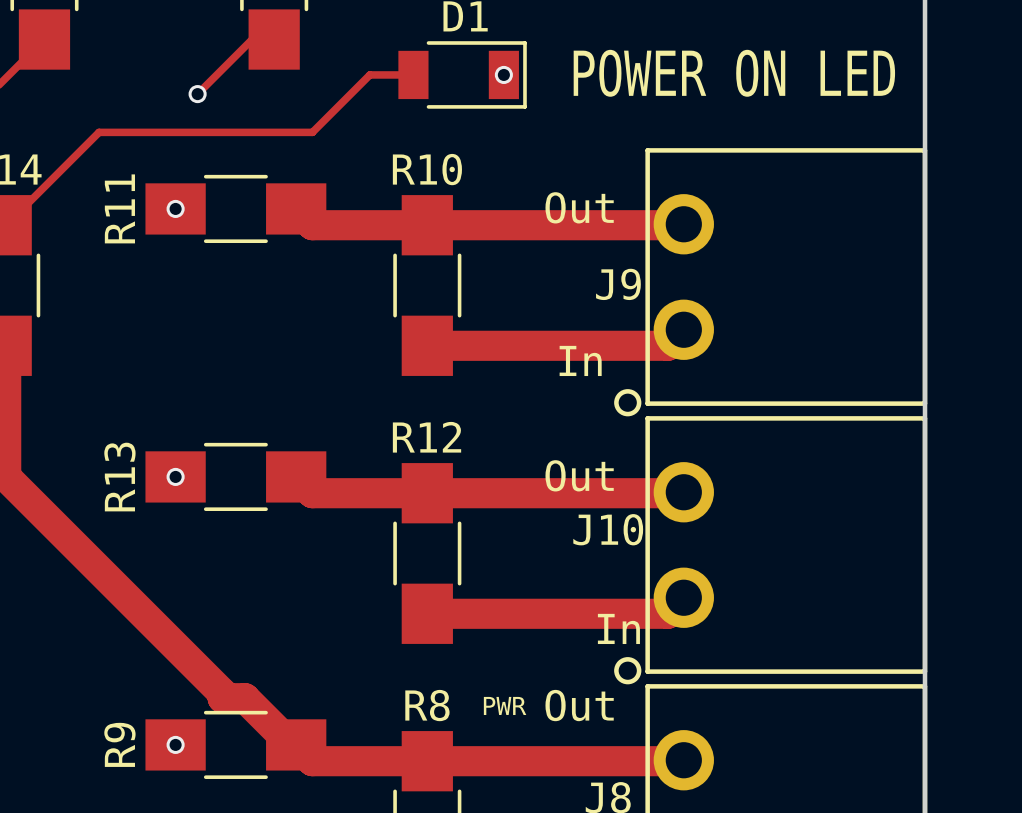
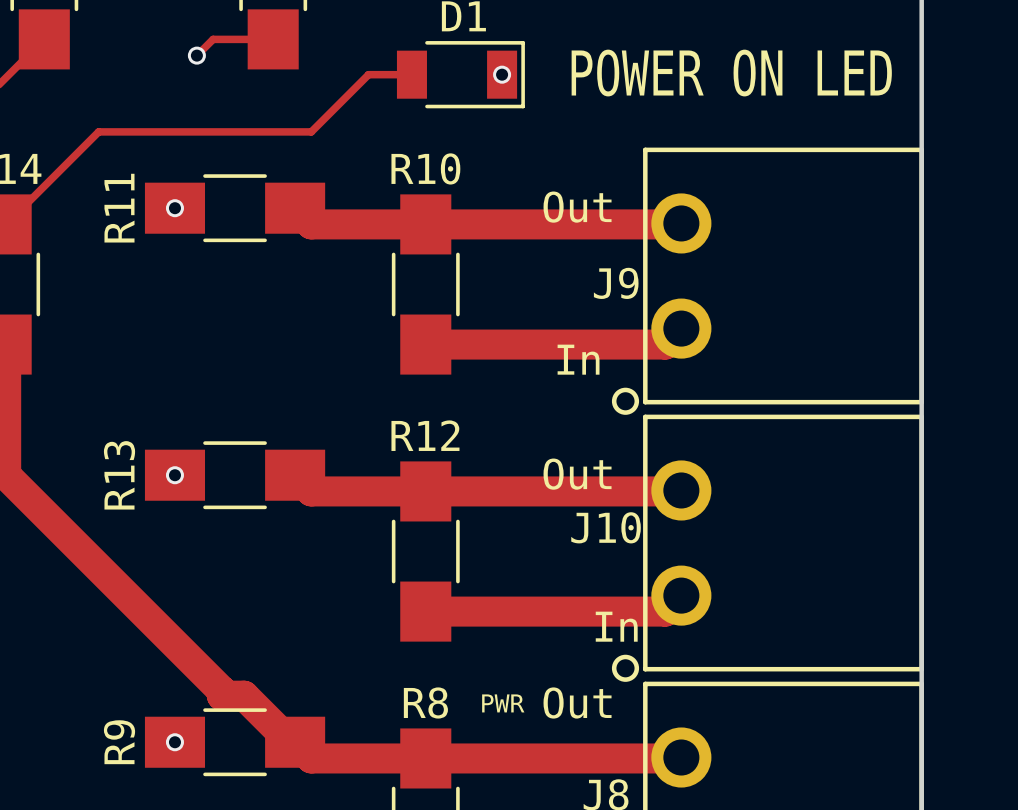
track: (252, 39) (197, 94) -> (251, 39) (213, 39) (196, 55)
via position: (197, 94) -> (196, 55)

